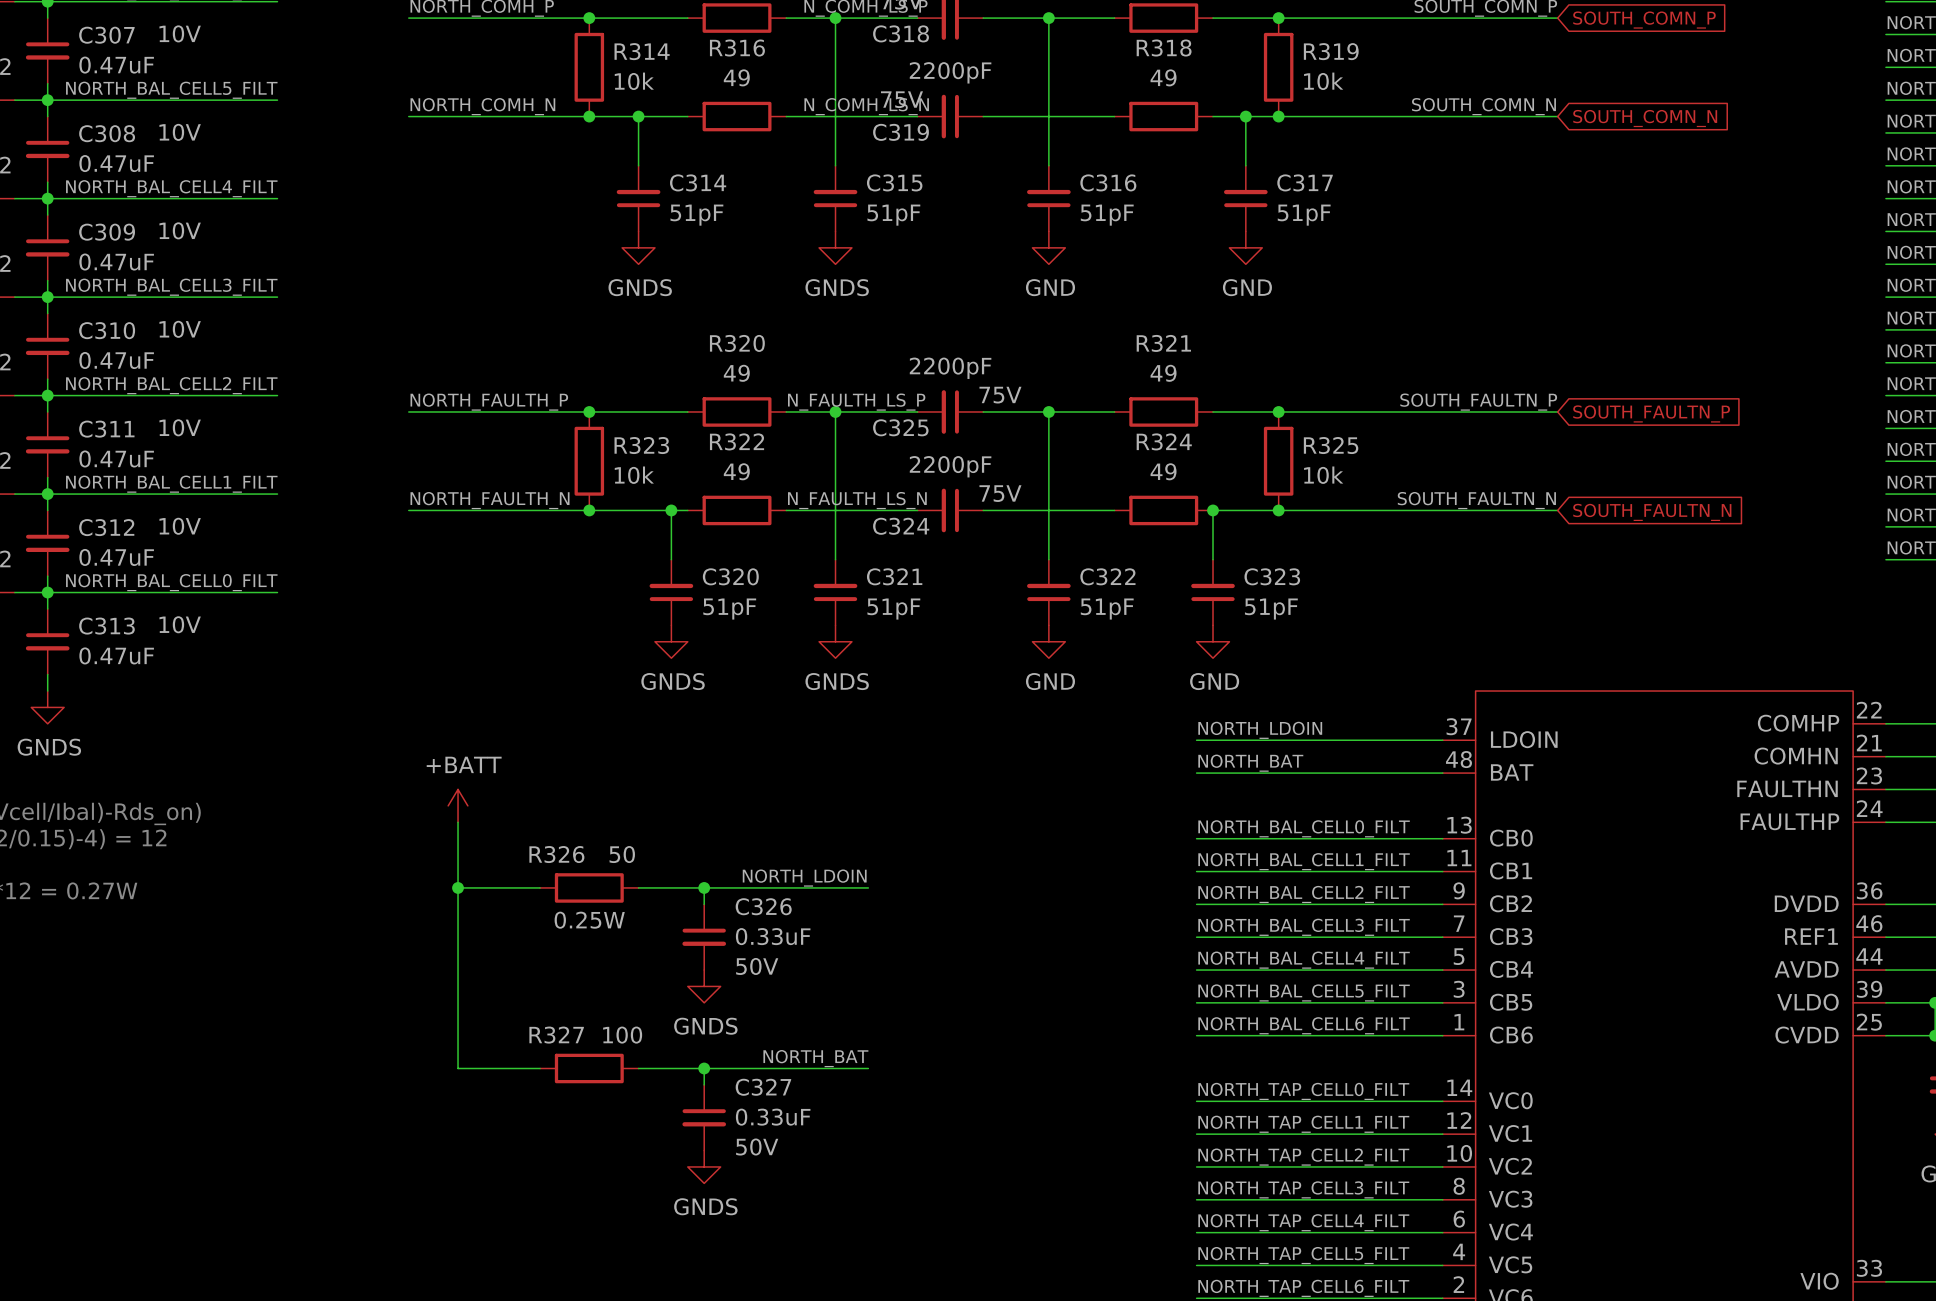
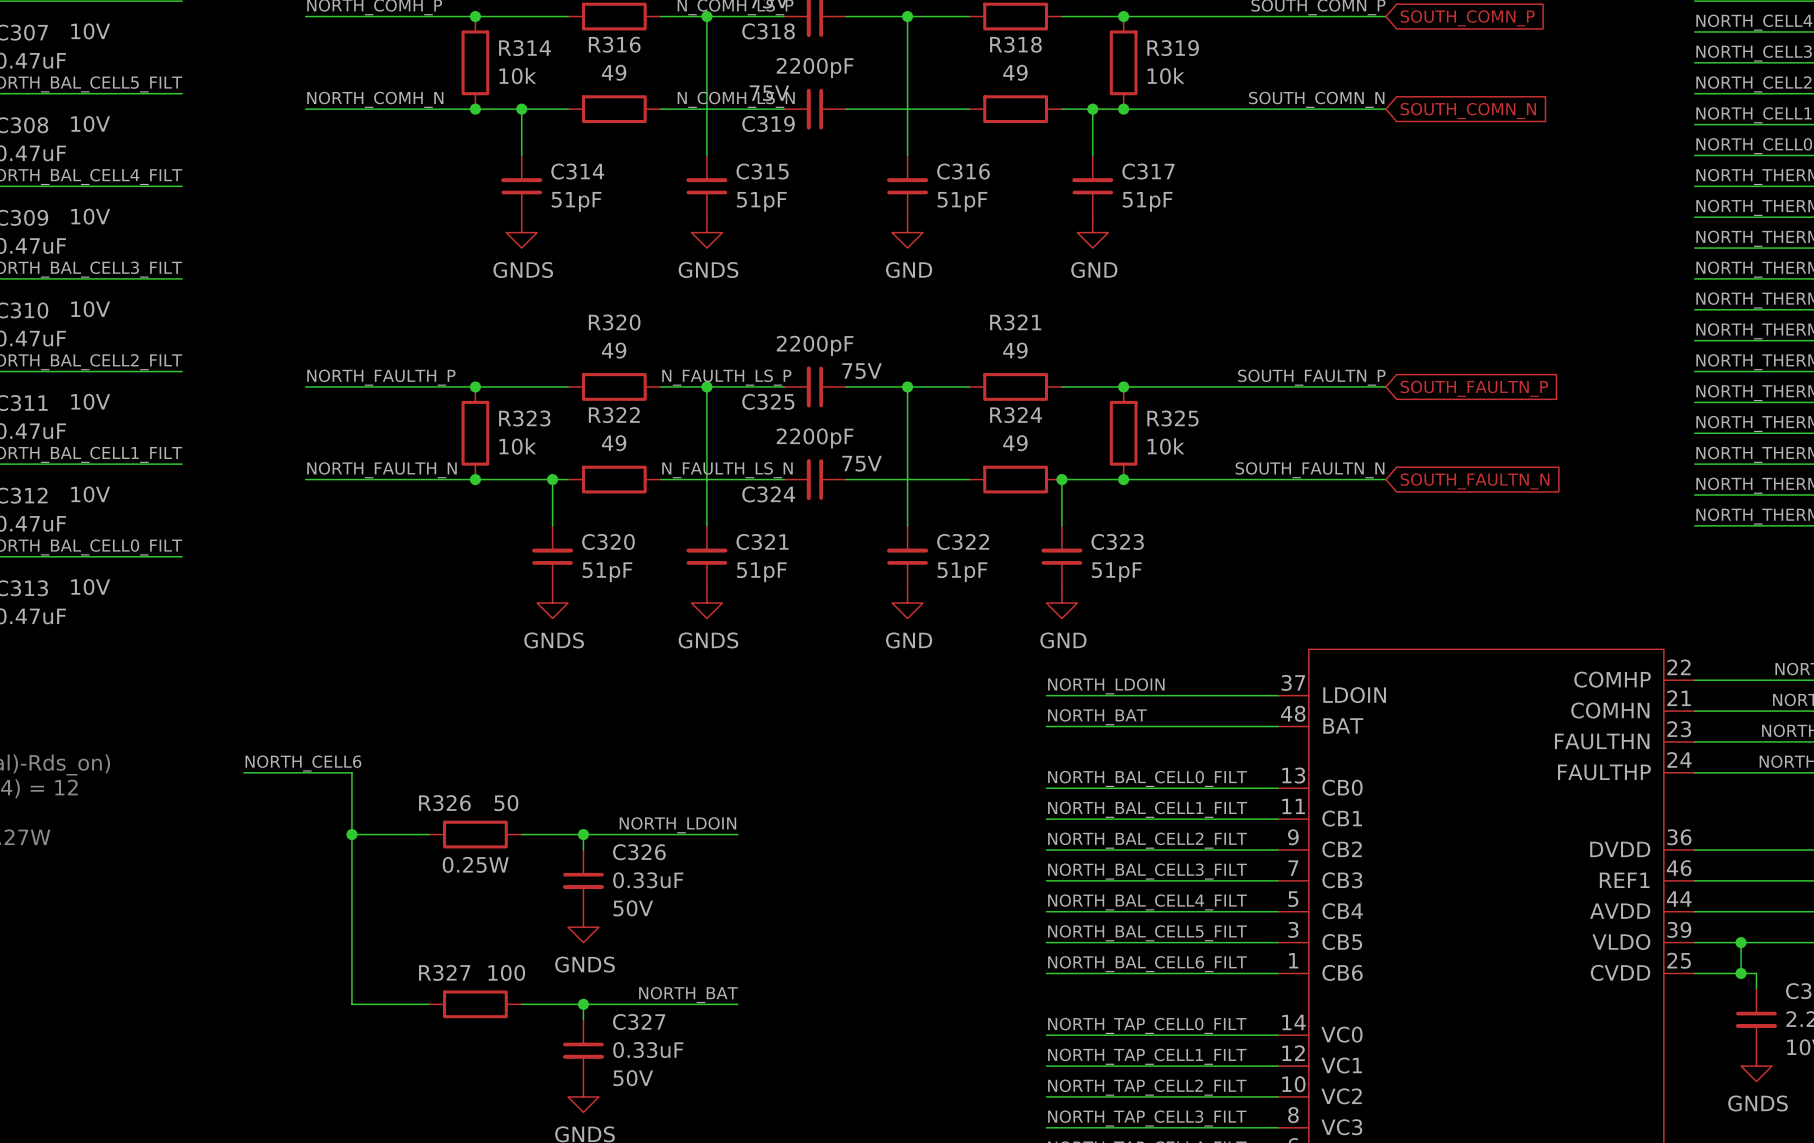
power symbol: +BATT (458, 805) -> none
label: none -> NORTH_CELL6 (303, 763)
wire: none -> (243, 772) (351, 772)

